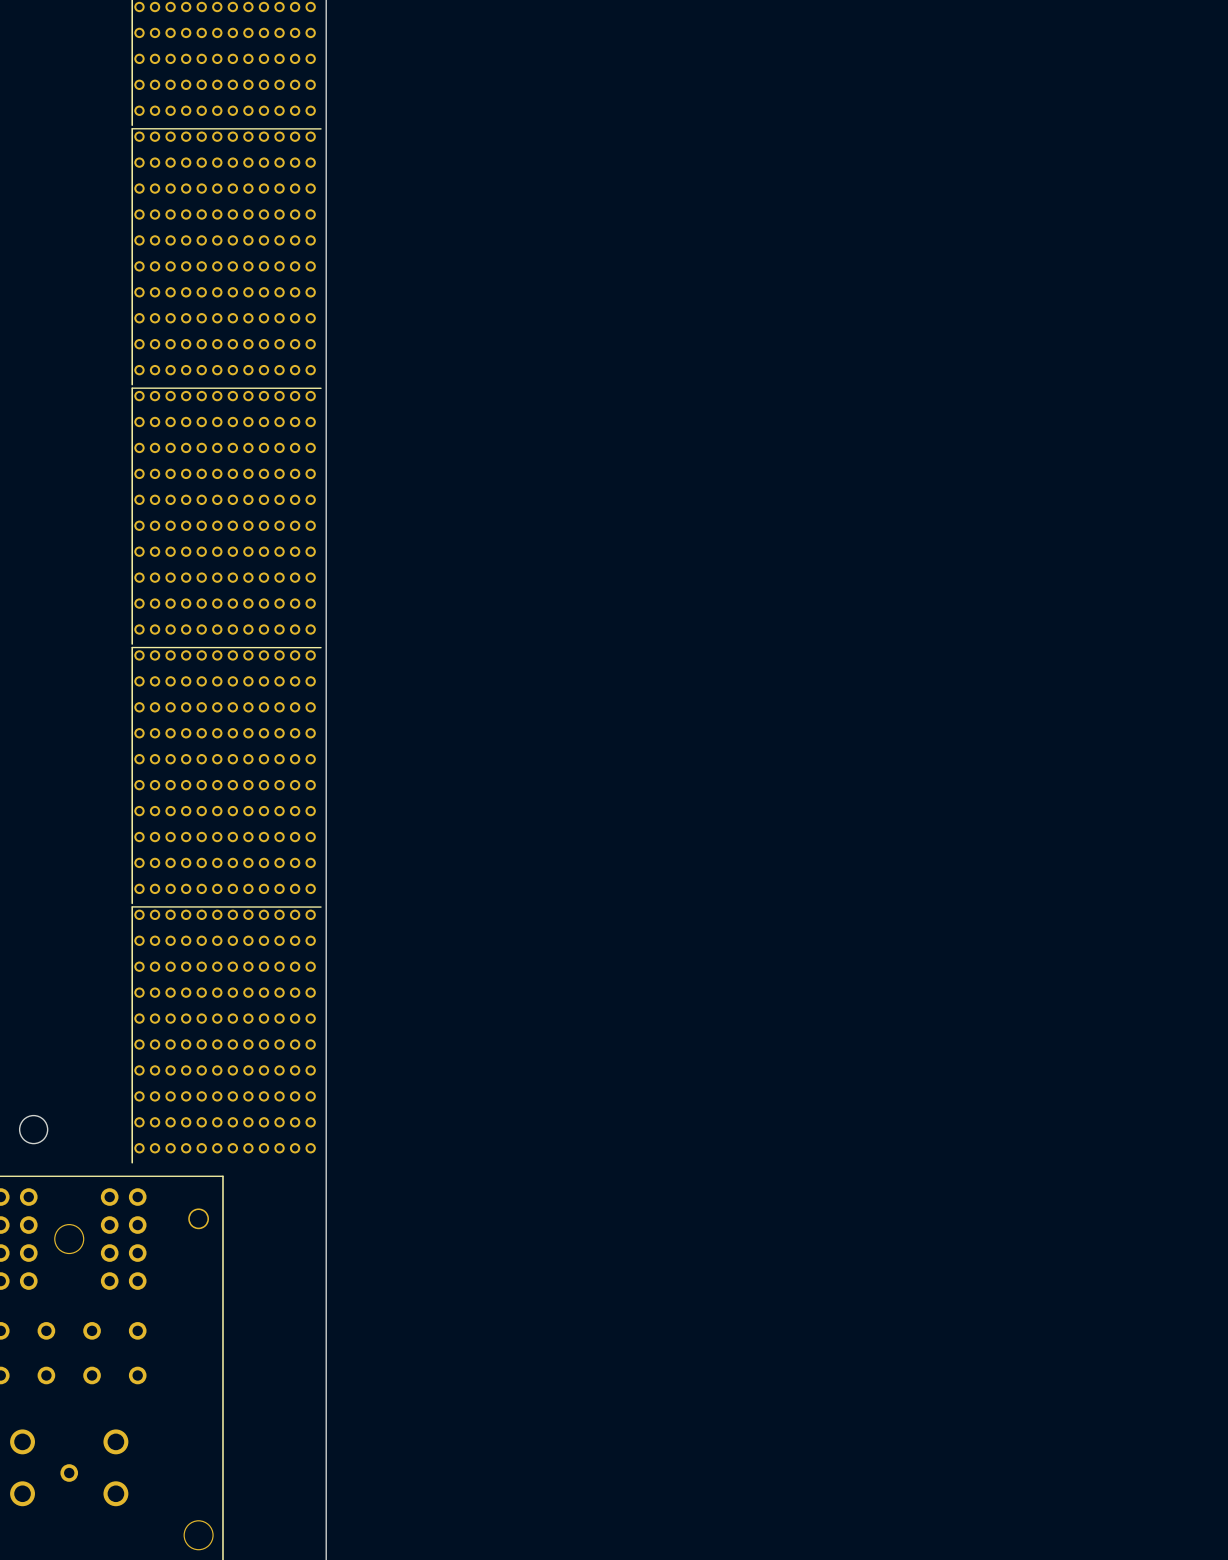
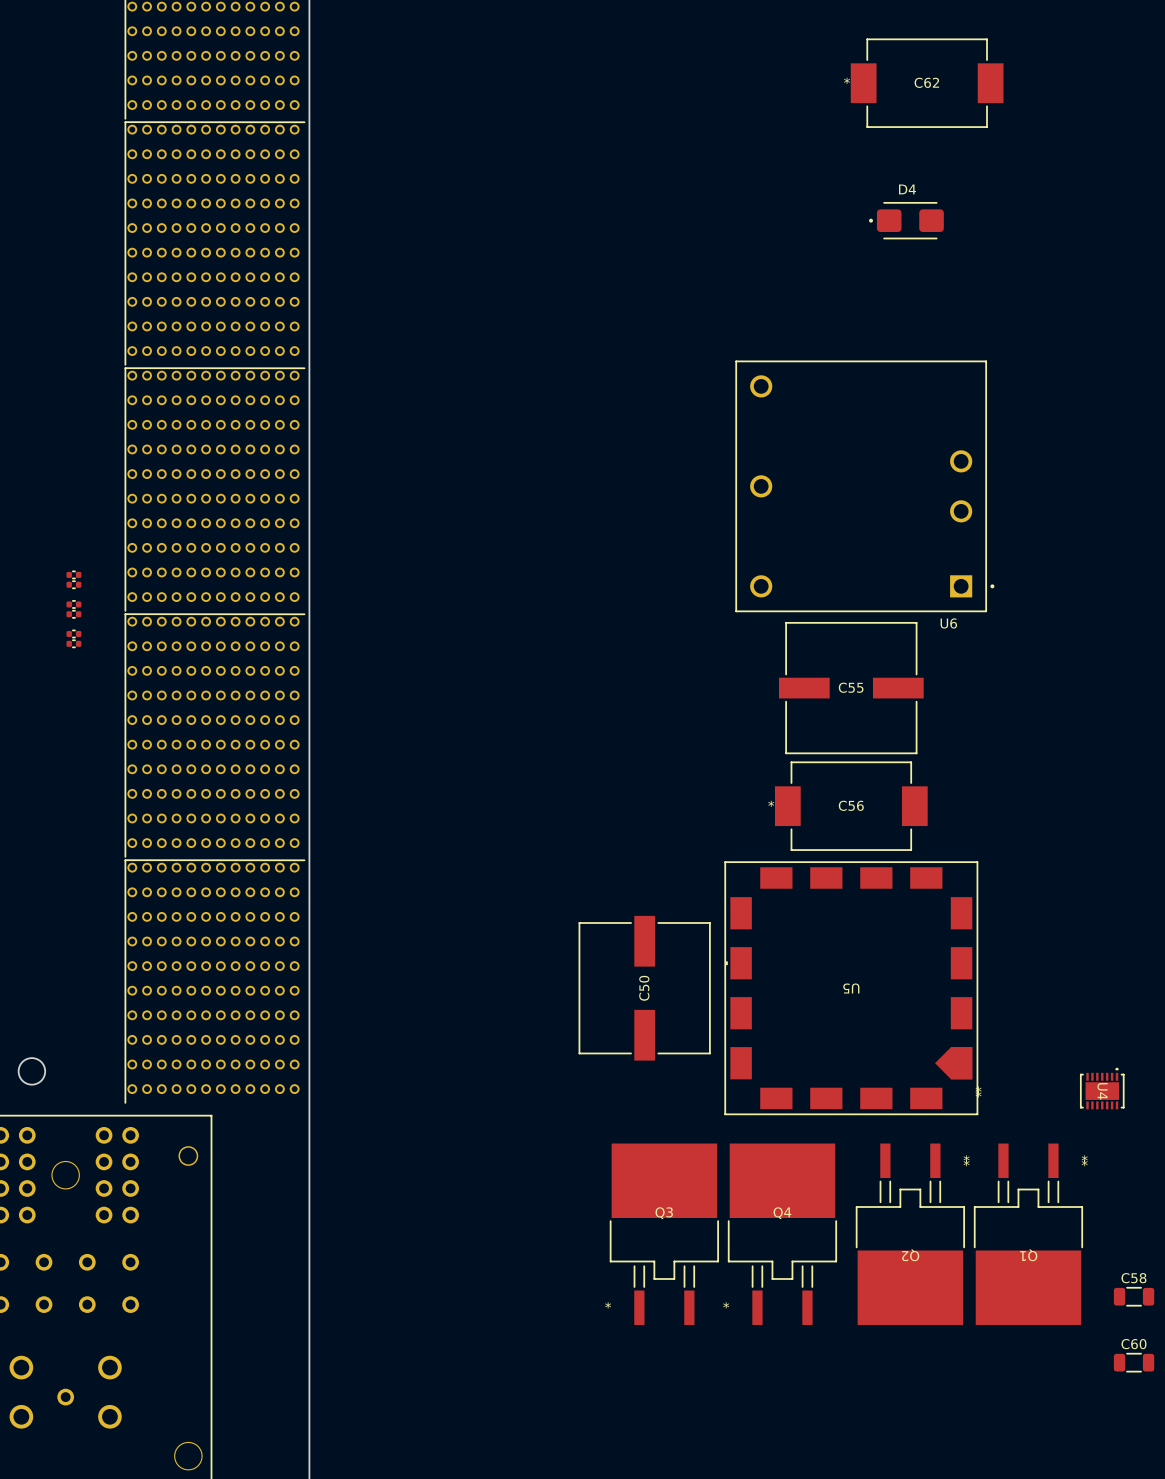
C62: none -> (927, 83)
D4: none -> (906, 220)
U6: none -> (864, 486)
part: none -> (73, 574)
part: none -> (73, 584)
part: none -> (73, 604)
part: none -> (73, 614)
part: none -> (73, 633)
part: none -> (73, 643)
C55: none -> (851, 688)
C56: none -> (851, 806)
C50: none -> (644, 988)
U5: none -> (851, 988)
U4: none -> (1102, 1088)
Q3: none -> (664, 1234)
Q4: none -> (782, 1234)
Q2: none -> (910, 1234)
Q1: none -> (1028, 1234)
C58: none -> (1134, 1296)
C60: none -> (1134, 1362)

